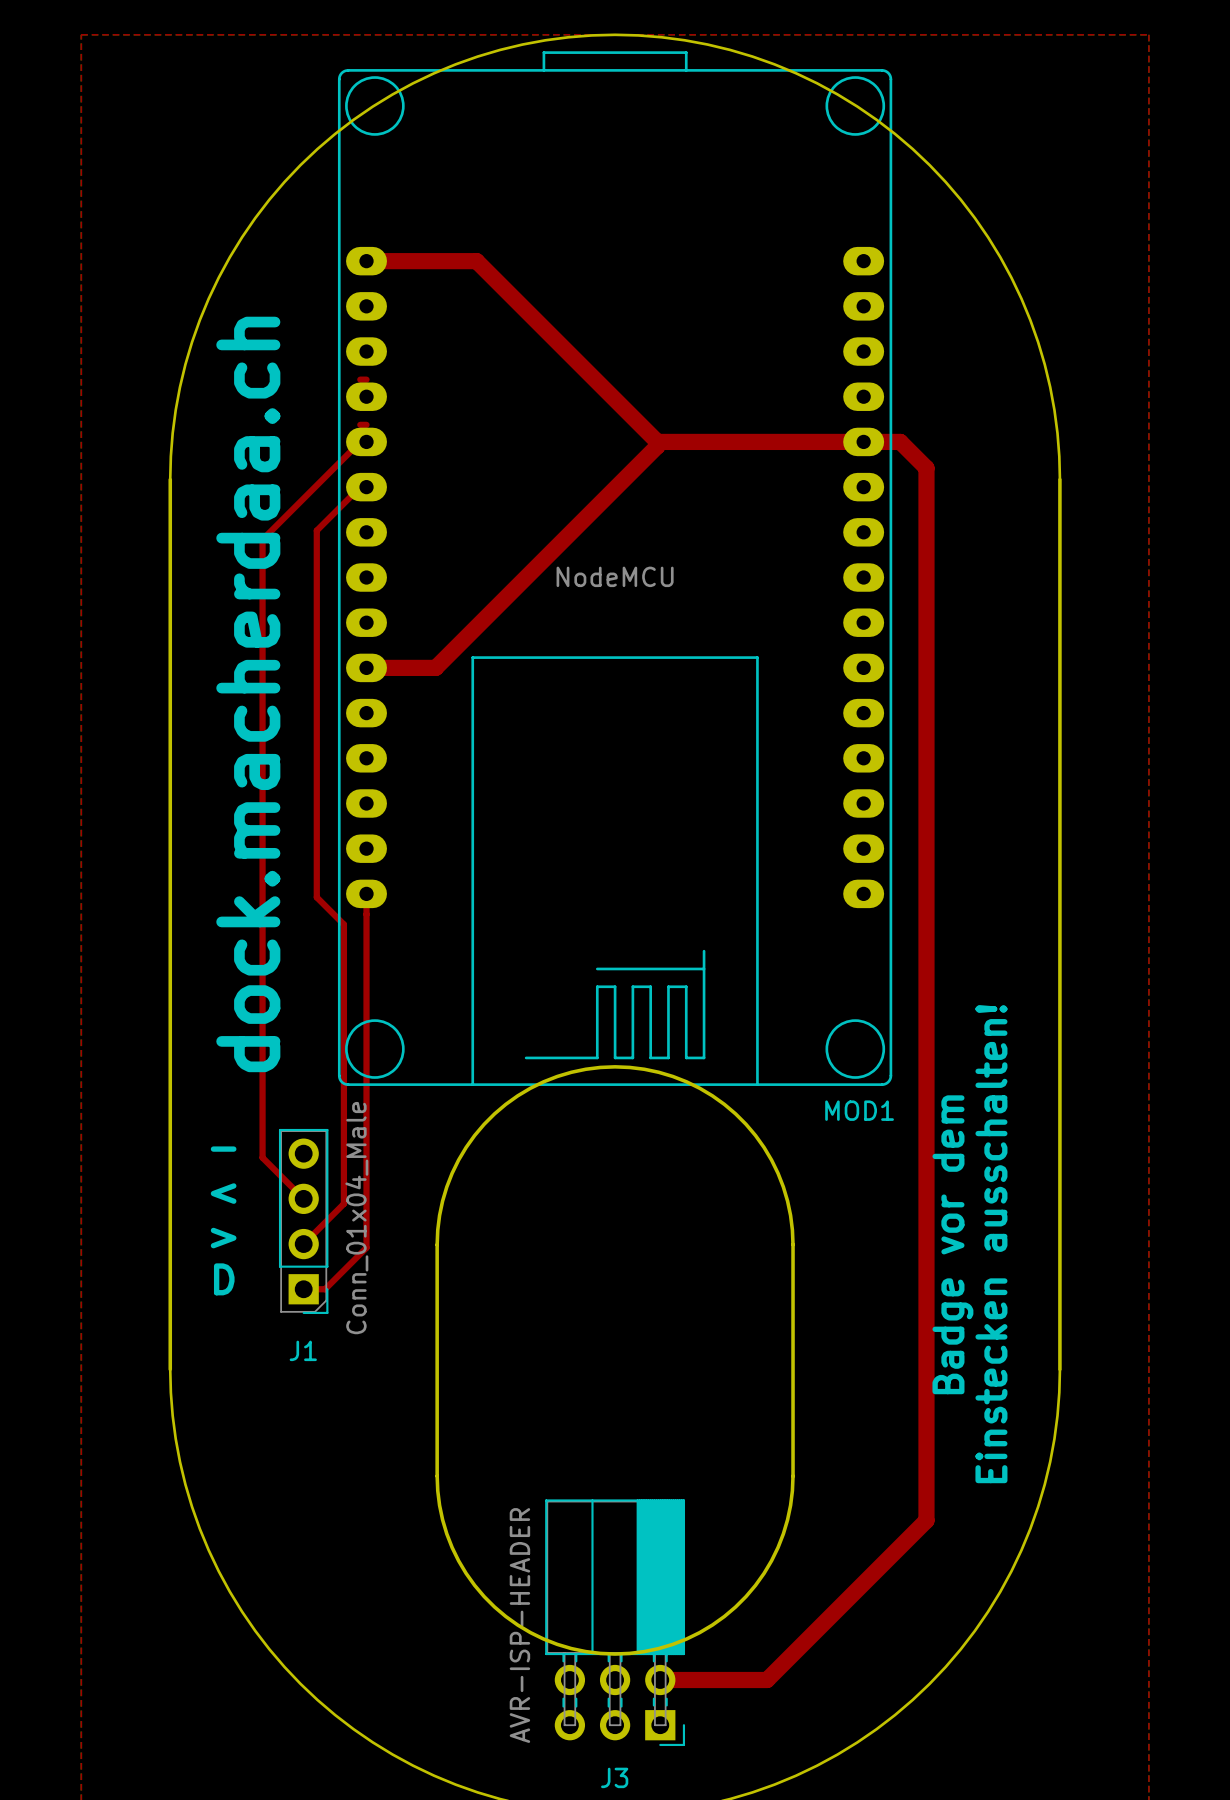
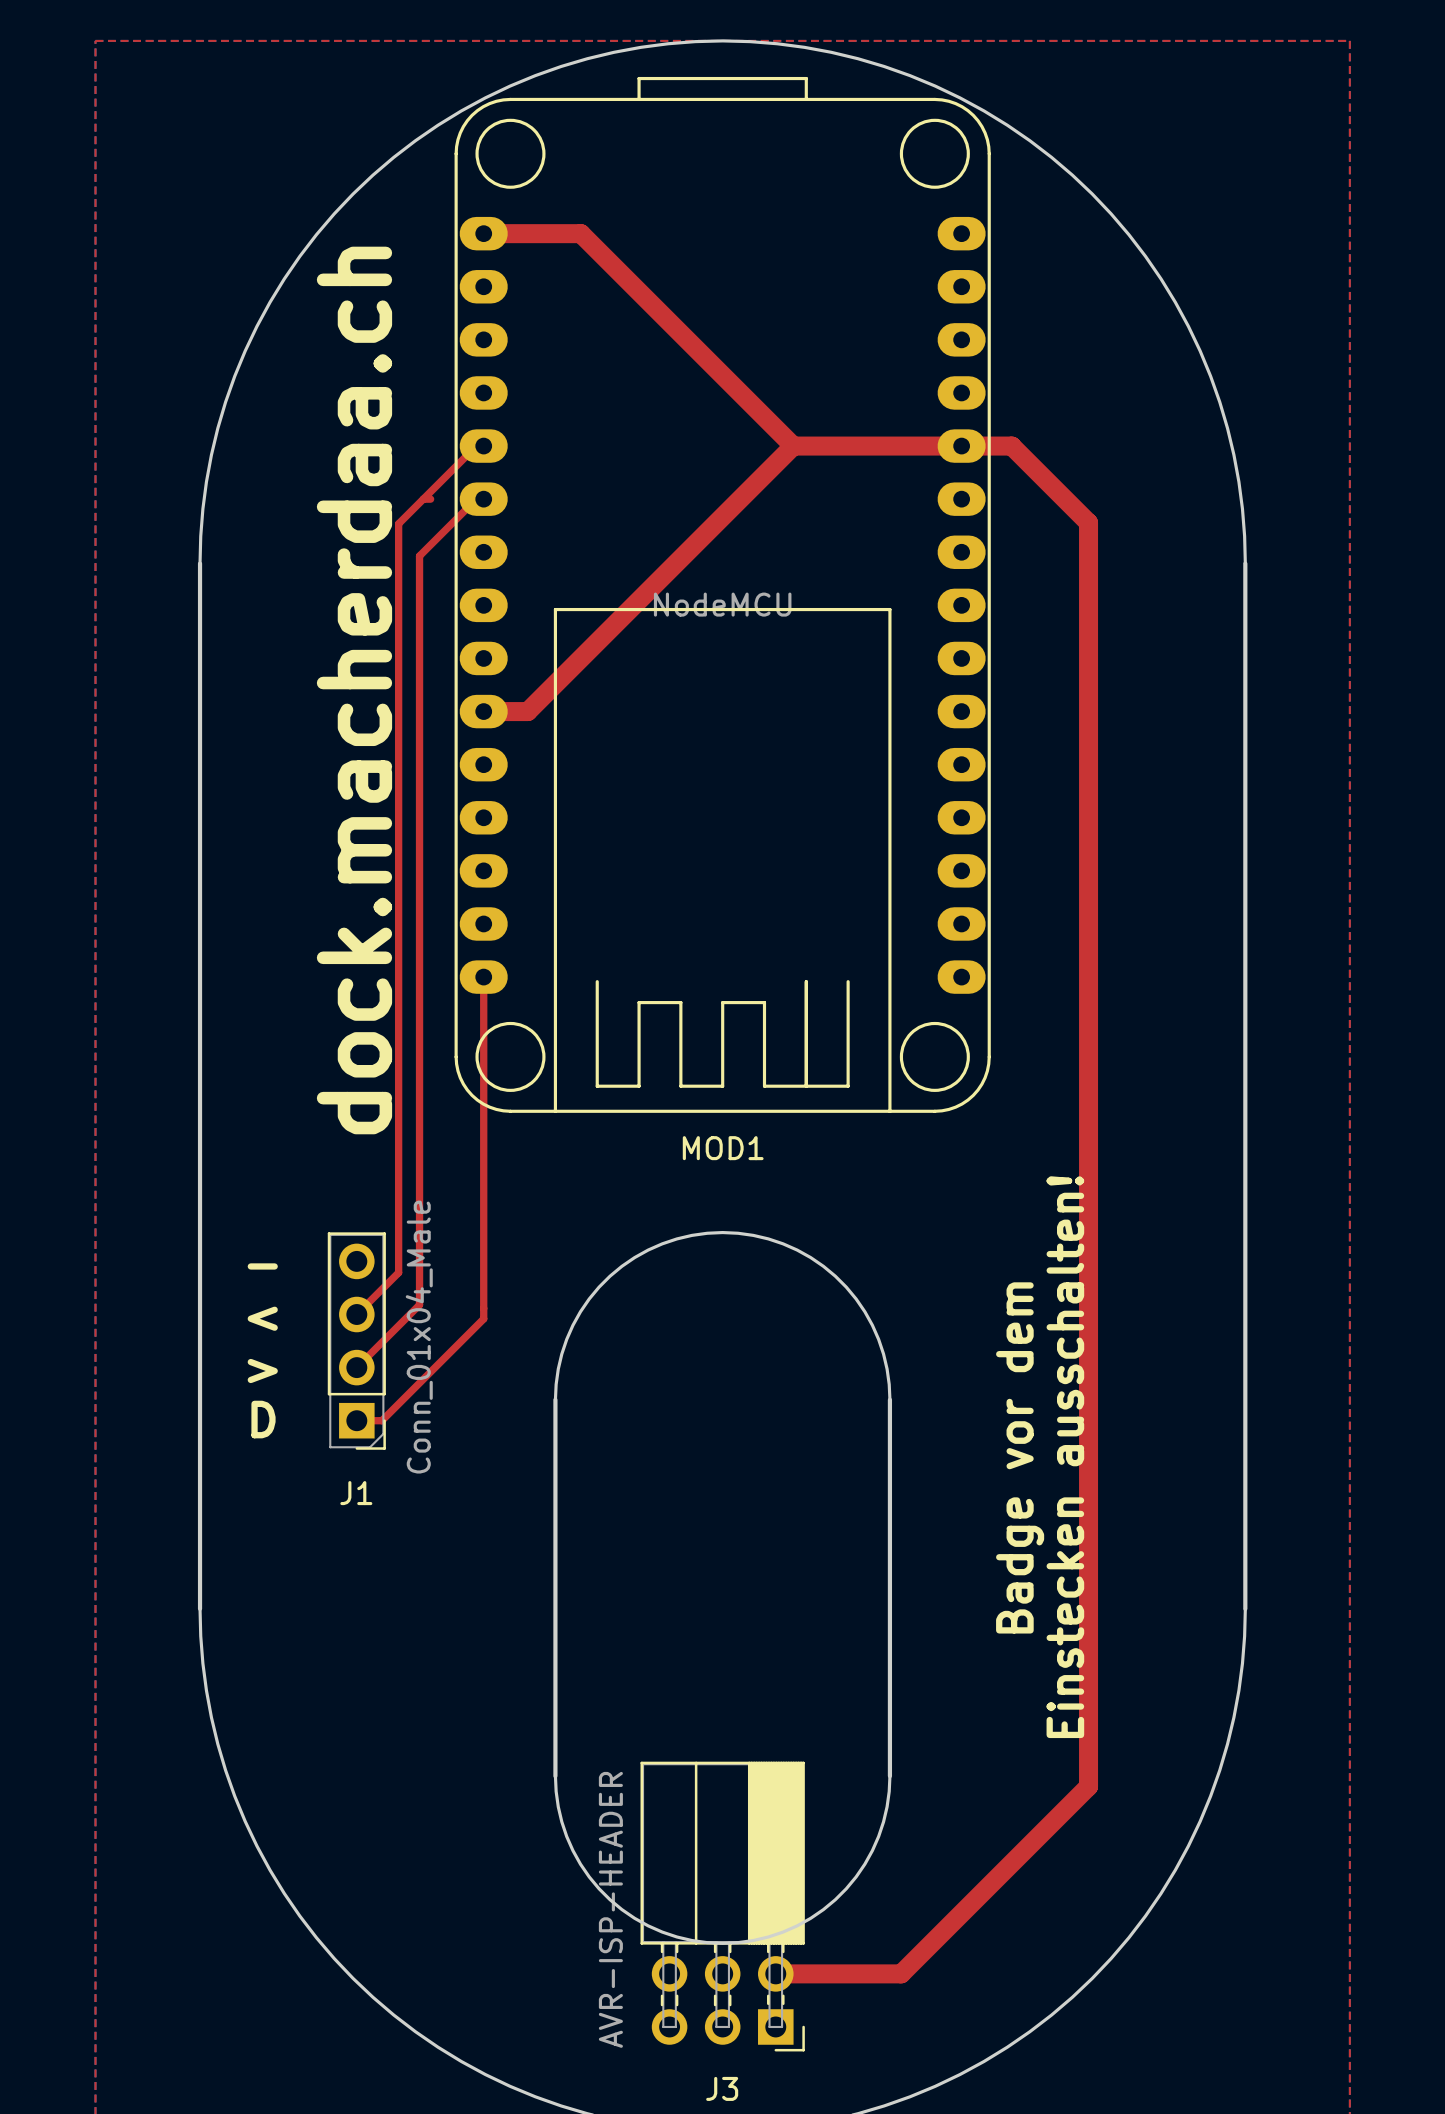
MOD1 footprint: [337, 51, 893, 1086] -> [454, 76, 991, 1113]
top track: none -> (483, 233) (580, 233) (793, 446)
top track: (366, 261) (476, 261) (657, 441) -> none
top track: (360, 379) (366, 379) -> none
top track: none -> (483, 446) (476, 446) (398, 523) (398, 1272) (356, 1314)
top track: none -> (793, 446) (527, 711) (483, 711)
top track: none -> (483, 499) (476, 499) (419, 556) (419, 1304) (356, 1367)
top track: (366, 441) (360, 441) (262, 539) (262, 1157) (303, 1198) -> none
top track: (657, 441) (900, 441) (926, 468) -> (793, 446) (1011, 446) (1088, 522) (1088, 549)
top track: (657, 441) (657, 446) (435, 667) (366, 667) -> none
top track: (366, 487) (360, 487) (316, 530) (316, 897) (343, 924) (343, 1203) (303, 1244) -> none
text position: dock.macherdaa.ch (248, 694) -> dock.macherdaa.ch (354, 690)
top track: none -> (483, 977) (483, 1318) (381, 1420) (356, 1420)
top track: (366, 893) (366, 1247) (325, 1289) (303, 1289) -> none
MOD1 name position: MOD1 (859, 1110) -> MOD1 (723, 1148)
text position: - (223, 1149) -> - (262, 1266)
text position: < (223, 1193) -> < (262, 1318)
J1 position: (303, 1221) -> (356, 1341)
text position: > (223, 1238) -> > (262, 1371)
board edge: (437, 1244) (437, 1490) (442, 1519) (452, 1547) (474, 1585) (494, 1607) (530, 1632) (557, 1644) (600, 1653) (629, 1653) (672, 1644) (699, 1632) (724, 1616) (746, 1596) (771, 1560) (787, 1519) (792, 1490) (792, 1230) (783, 1187) (771, 1160) (755, 1135) (735, 1113) (712, 1095) (672, 1076) (644, 1069) (615, 1066) (585, 1069) (557, 1076) (530, 1088) (505, 1104) (474, 1135) (458, 1160) (446, 1187) (439, 1215) (437, 1244) -> (555, 1399) (555, 1776) (561, 1821) (572, 1850) (589, 1876) (610, 1899) (634, 1918) (662, 1932) (691, 1940) (738, 1942) (768, 1936) (797, 1925) (823, 1909) (856, 1876) (878, 1836) (889, 1791) (889, 1399) (887, 1369) (872, 1325) (846, 1287) (823, 1266) (797, 1250) (768, 1238) (738, 1233) (707, 1233) (676, 1238) (634, 1257) (610, 1276) (589, 1299) (572, 1325) (561, 1354) (555, 1399)
text position: Badge vor dem (952, 1244) -> Badge vor dem (1020, 1457)
text position: Einstecken ausschalten! (991, 1244) -> Einstecken ausschalten! (1065, 1457)
text position: D (224, 1279) -> D (263, 1419)

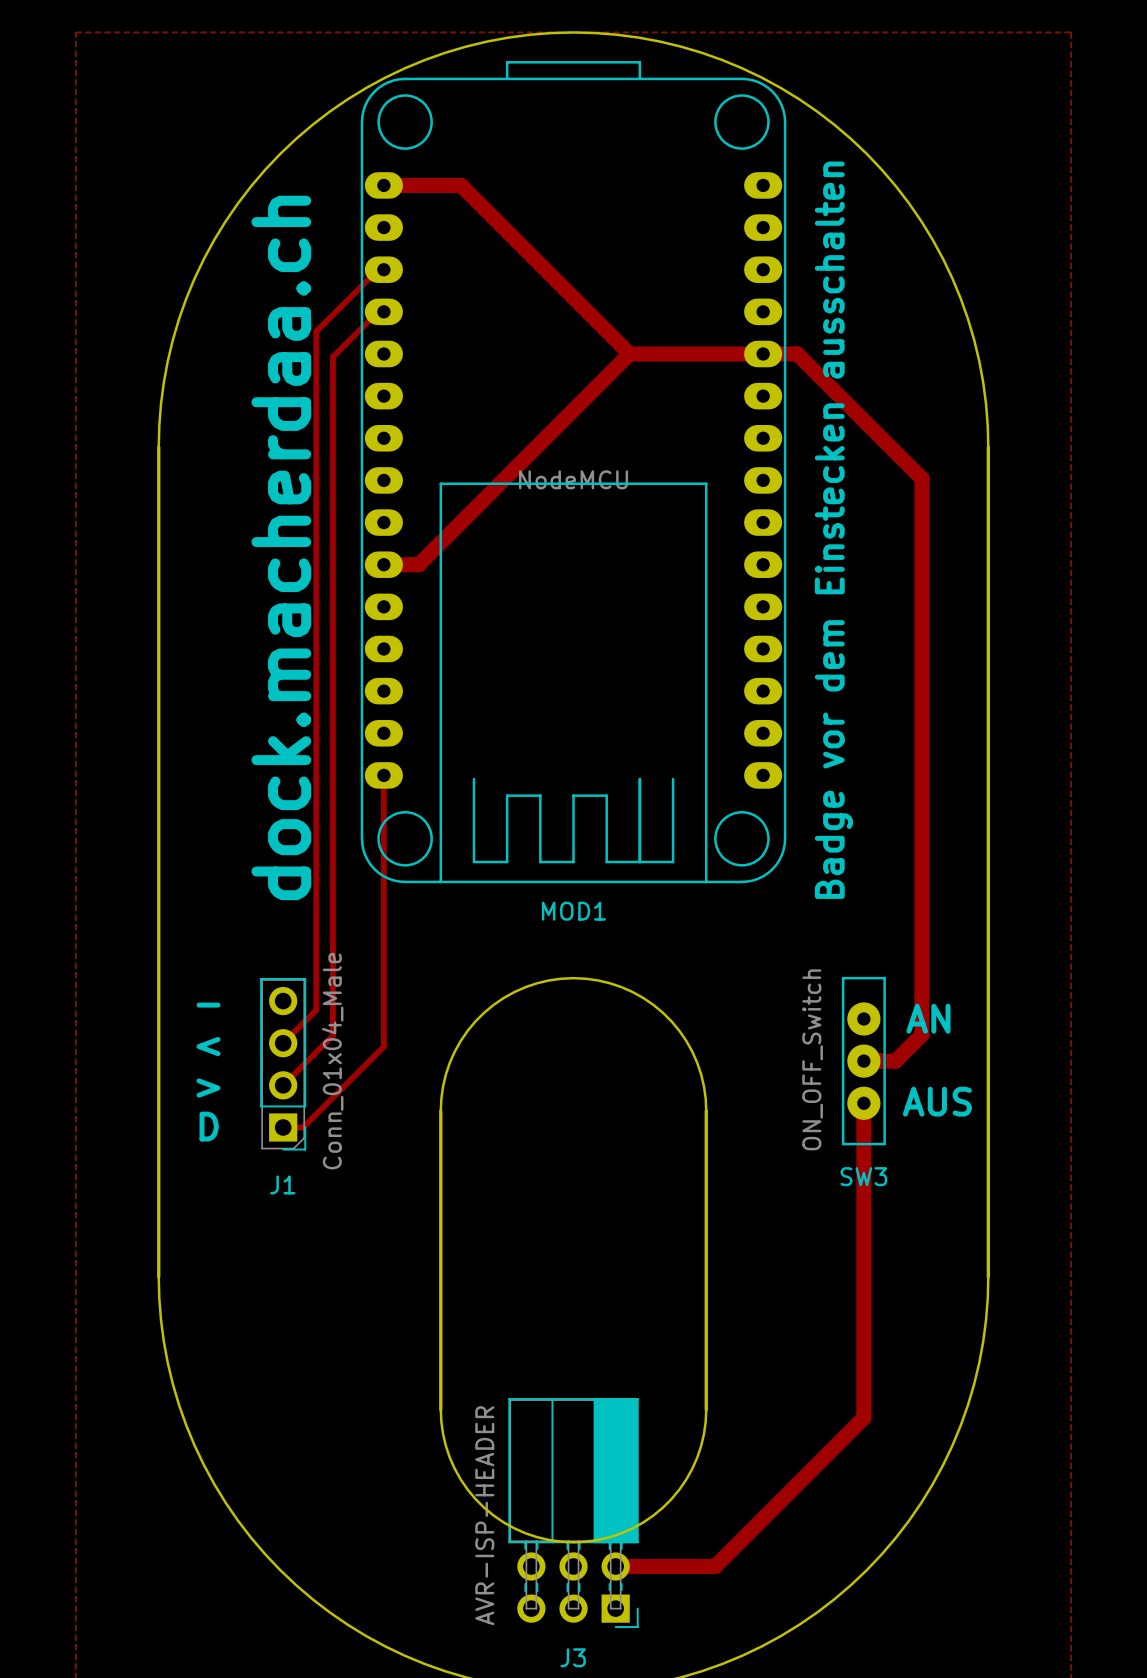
top track: (483, 446) (476, 446) (398, 523) -> (383, 269) (378, 269) (316, 331) (316, 415)
top track: (1004, 446) (1011, 446) (1088, 522) (1088, 1390) -> (797, 353) (921, 478) (921, 1034) (895, 1061) (863, 1061)
top track: (423, 499) (430, 499) -> none
top track: (483, 499) (476, 499) (419, 556) -> (383, 311) (378, 311) (332, 356) (332, 441)
text: none -> Badge vor dem Einstecken ausschalten (833, 530)
text: none -> AN (928, 1018)
SW3: none -> ON_OFF_Switch (863, 1061)
text: none -> AUS (937, 1101)
text: Badge vor dem (1020, 1457) -> none
text: Einstecken ausschalten! (1065, 1457) -> none

